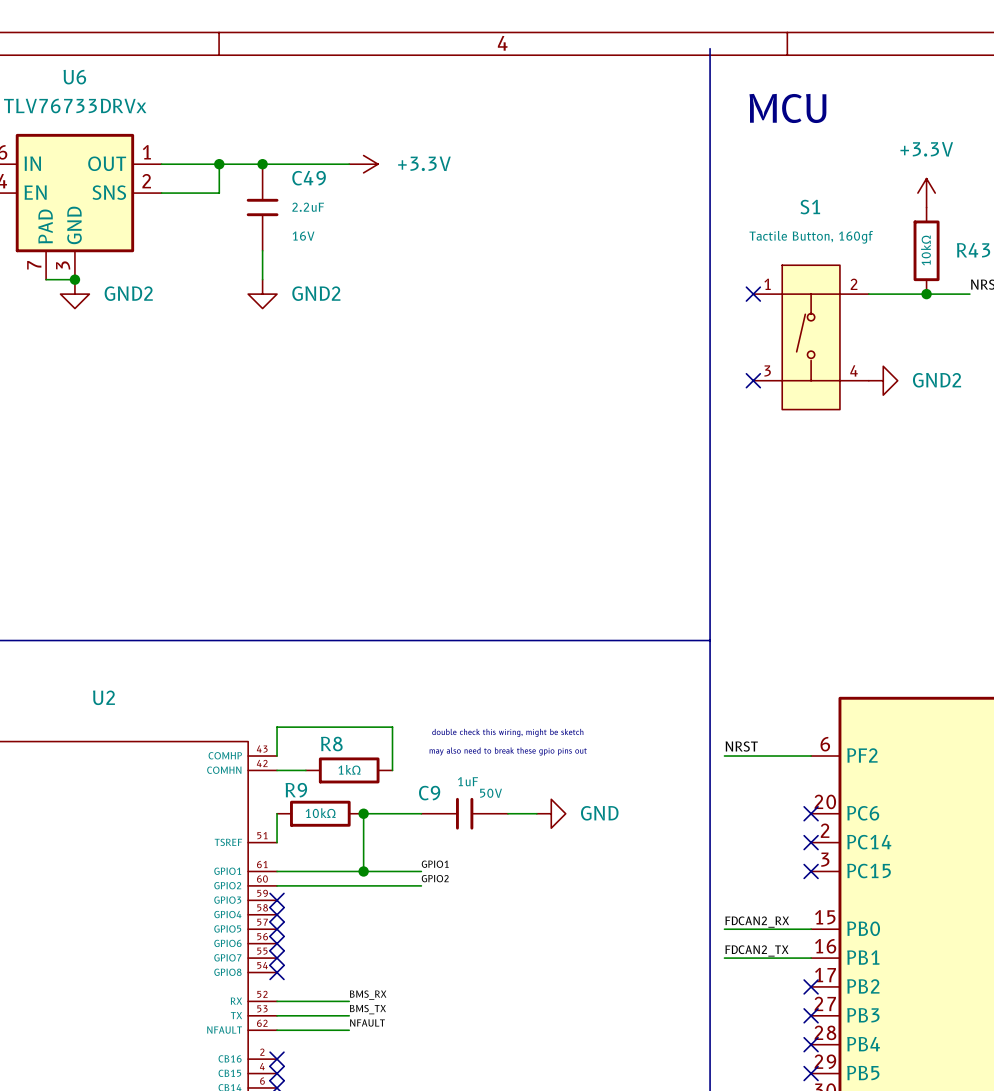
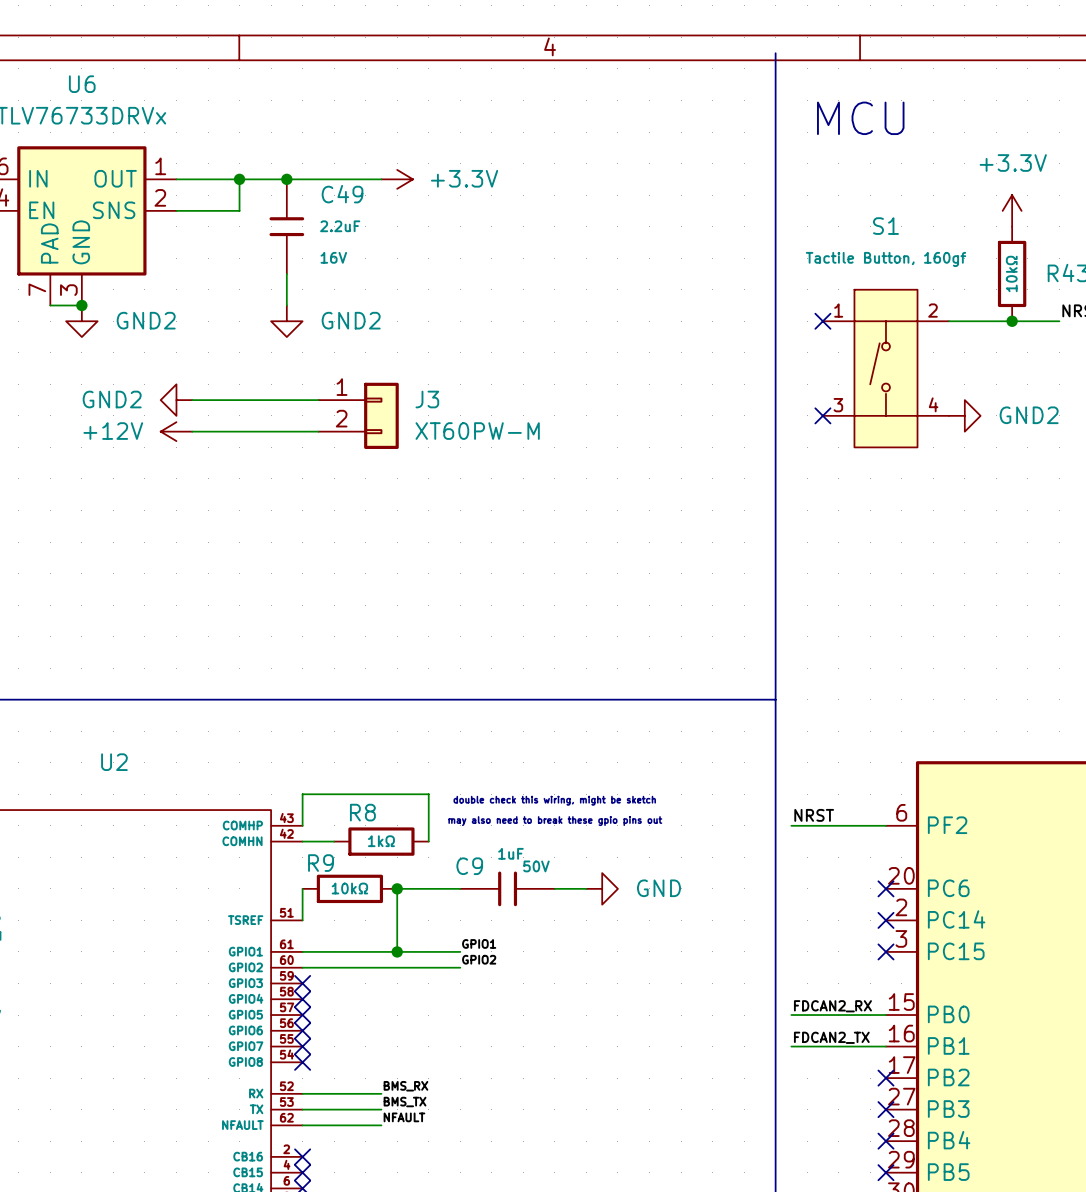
power symbol: none -> GND2 (176, 400)
wire: none -> (192, 400) (318, 400)
J3: none -> XT60PW-M (358, 415)
power symbol: none -> +12V (176, 431)
wire: none -> (192, 431) (318, 431)

